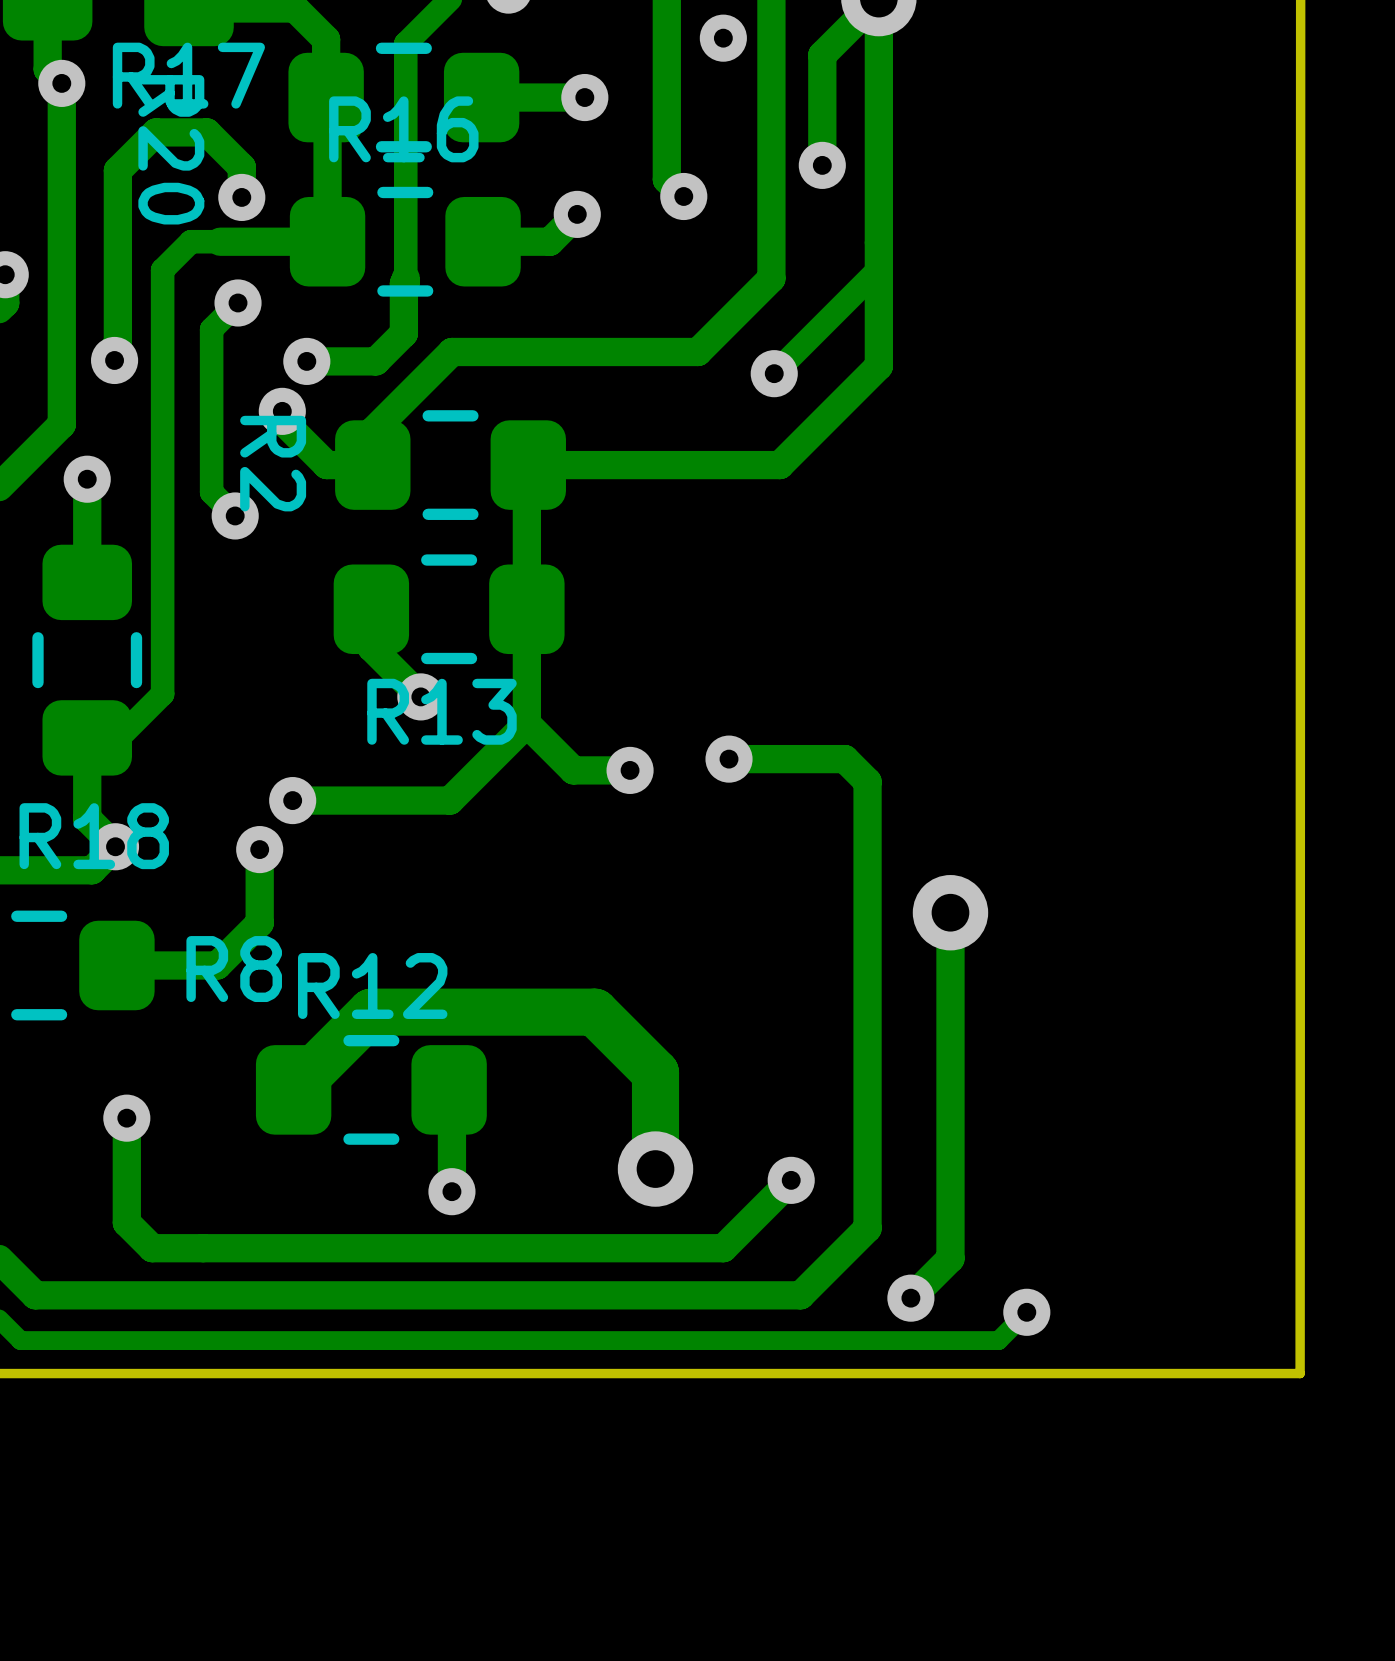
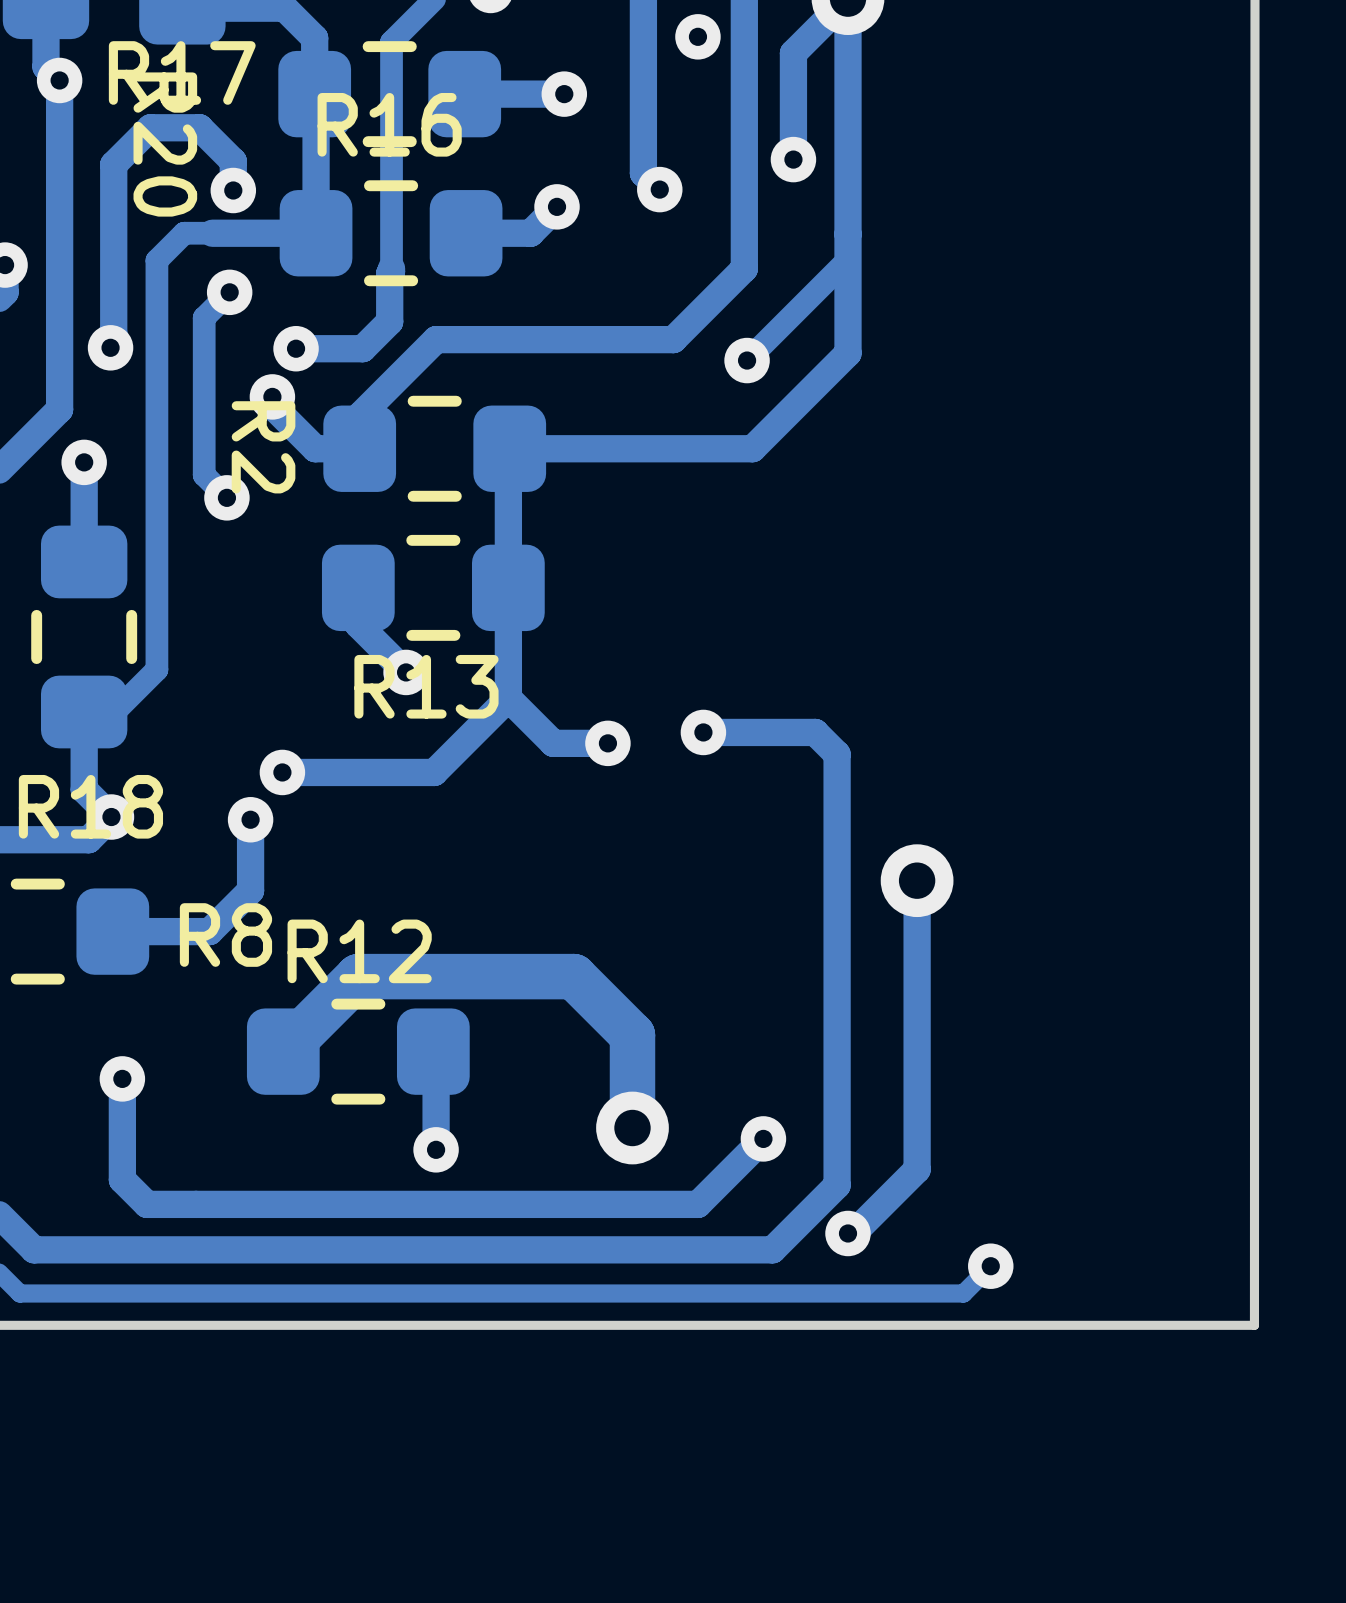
track: (950, 1212) (950, 1258) (910, 1298) -> (917, 1169) (850, 1236)
via position: (910, 1298) -> (848, 1233)

